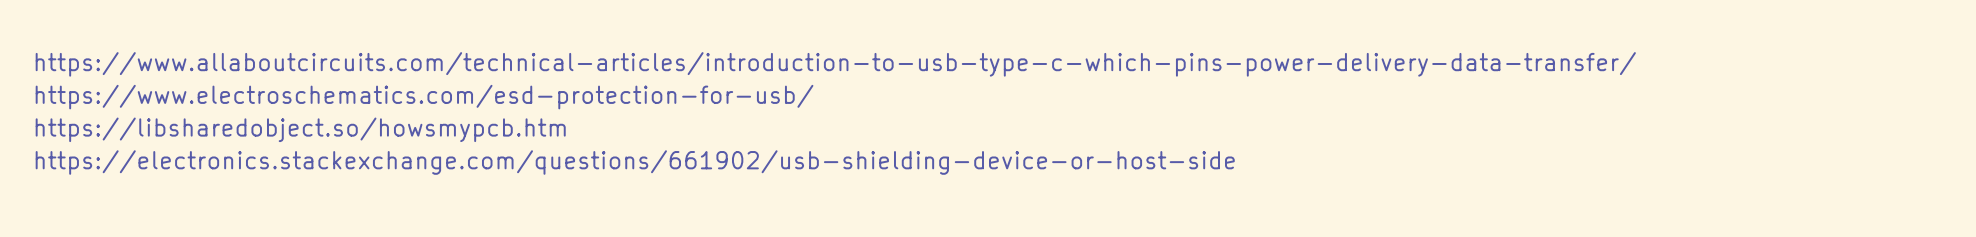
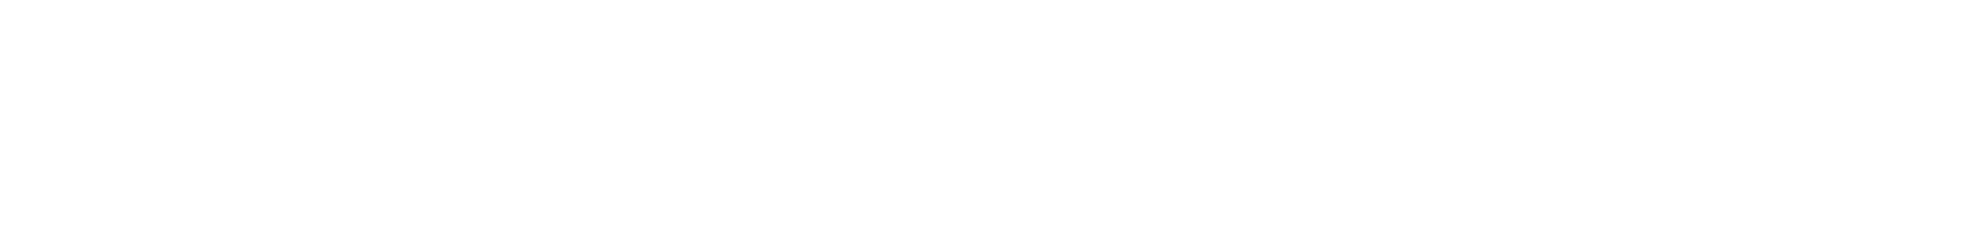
text: https://www.allaboutcircuits.com/technical-articles/introduction-to-usb-type-c-which-pins-power-delivery-data-transfer/ (835, 64) -> none
text: https://www.electroschematics.com/esd-protection-for-usb/ (424, 97) -> none
text: https://libsharedobject.so/howsmypcb.htm (300, 129) -> none
text: https://electronics.stackexchange.com/questions/661902/usb-shielding-device-or-host-side (635, 162) -> none

